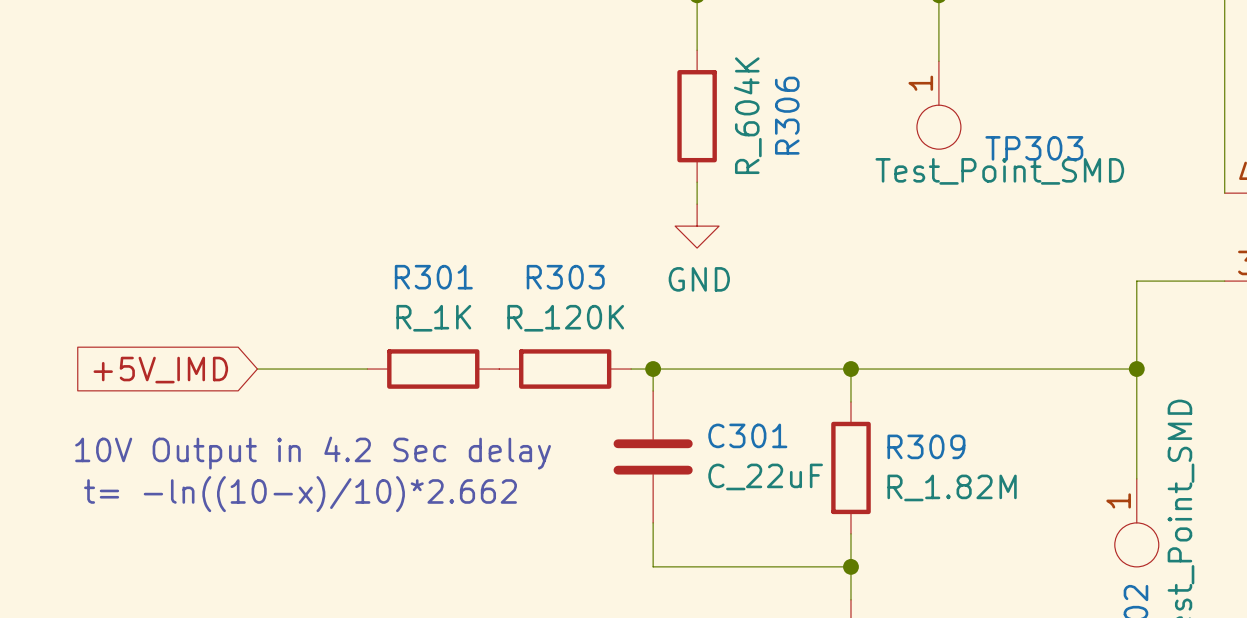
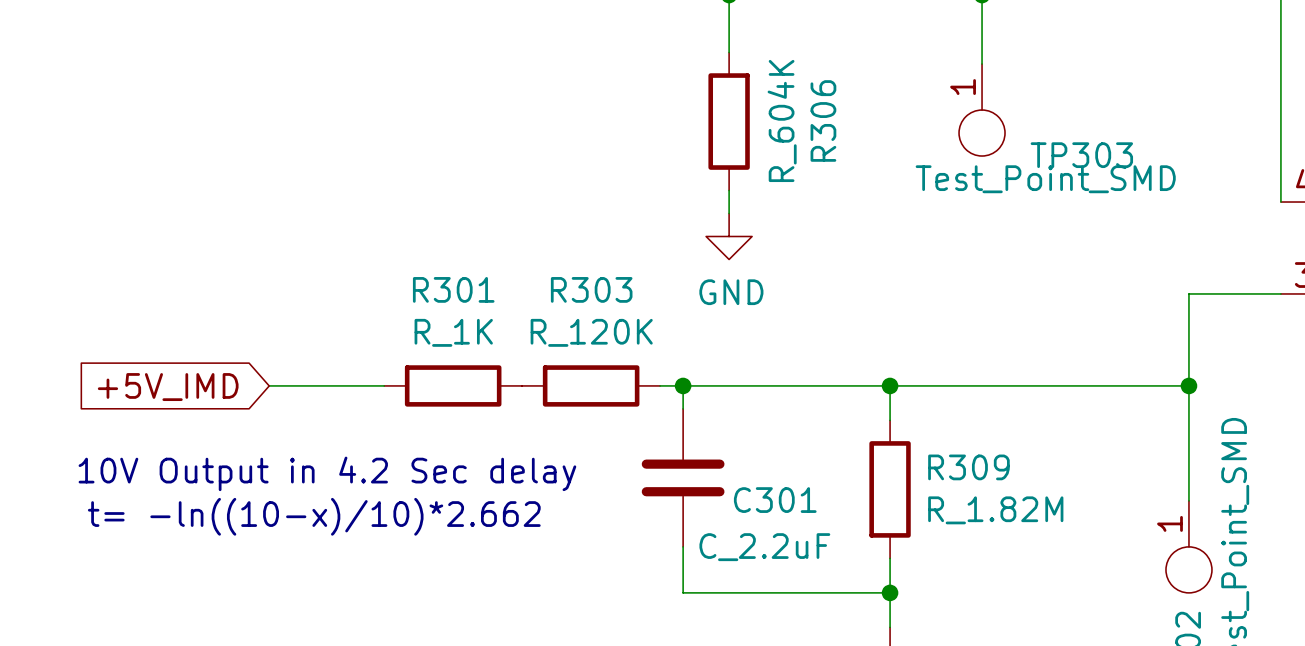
C301 name position: C301 (747, 435) -> C301 (775, 500)
C301 value: C_22uF (765, 476) -> C_2.2uF (764, 547)

